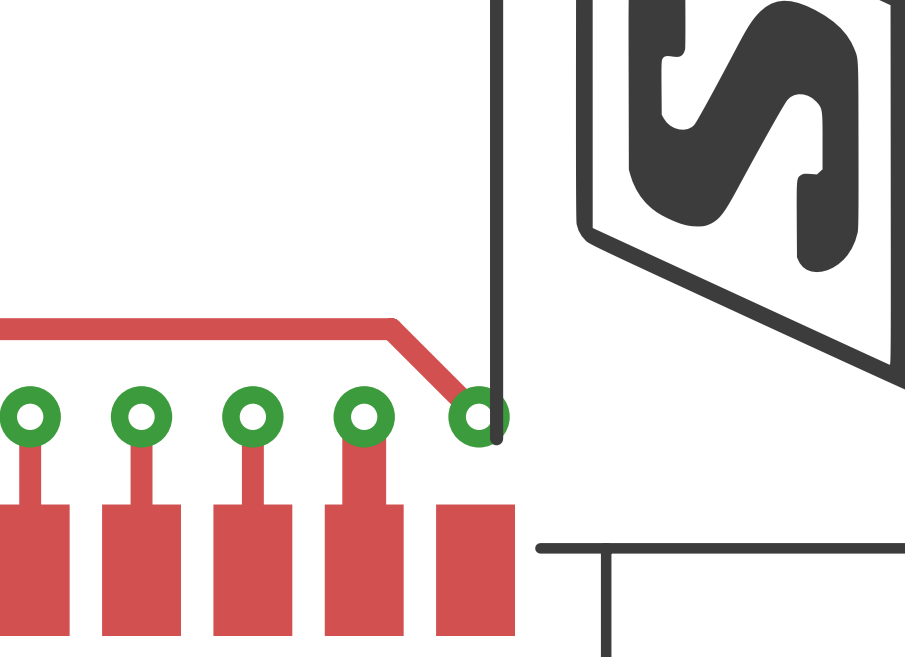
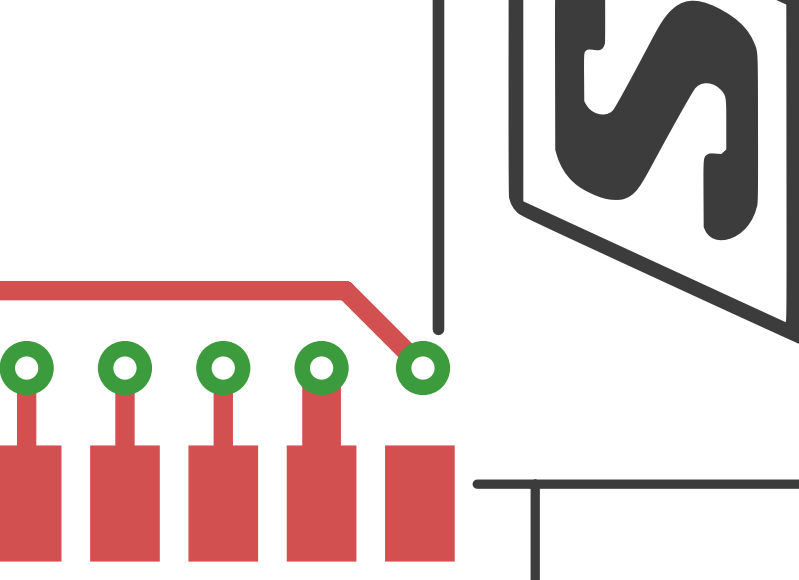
line: (496, 373) (496, 438) -> none

